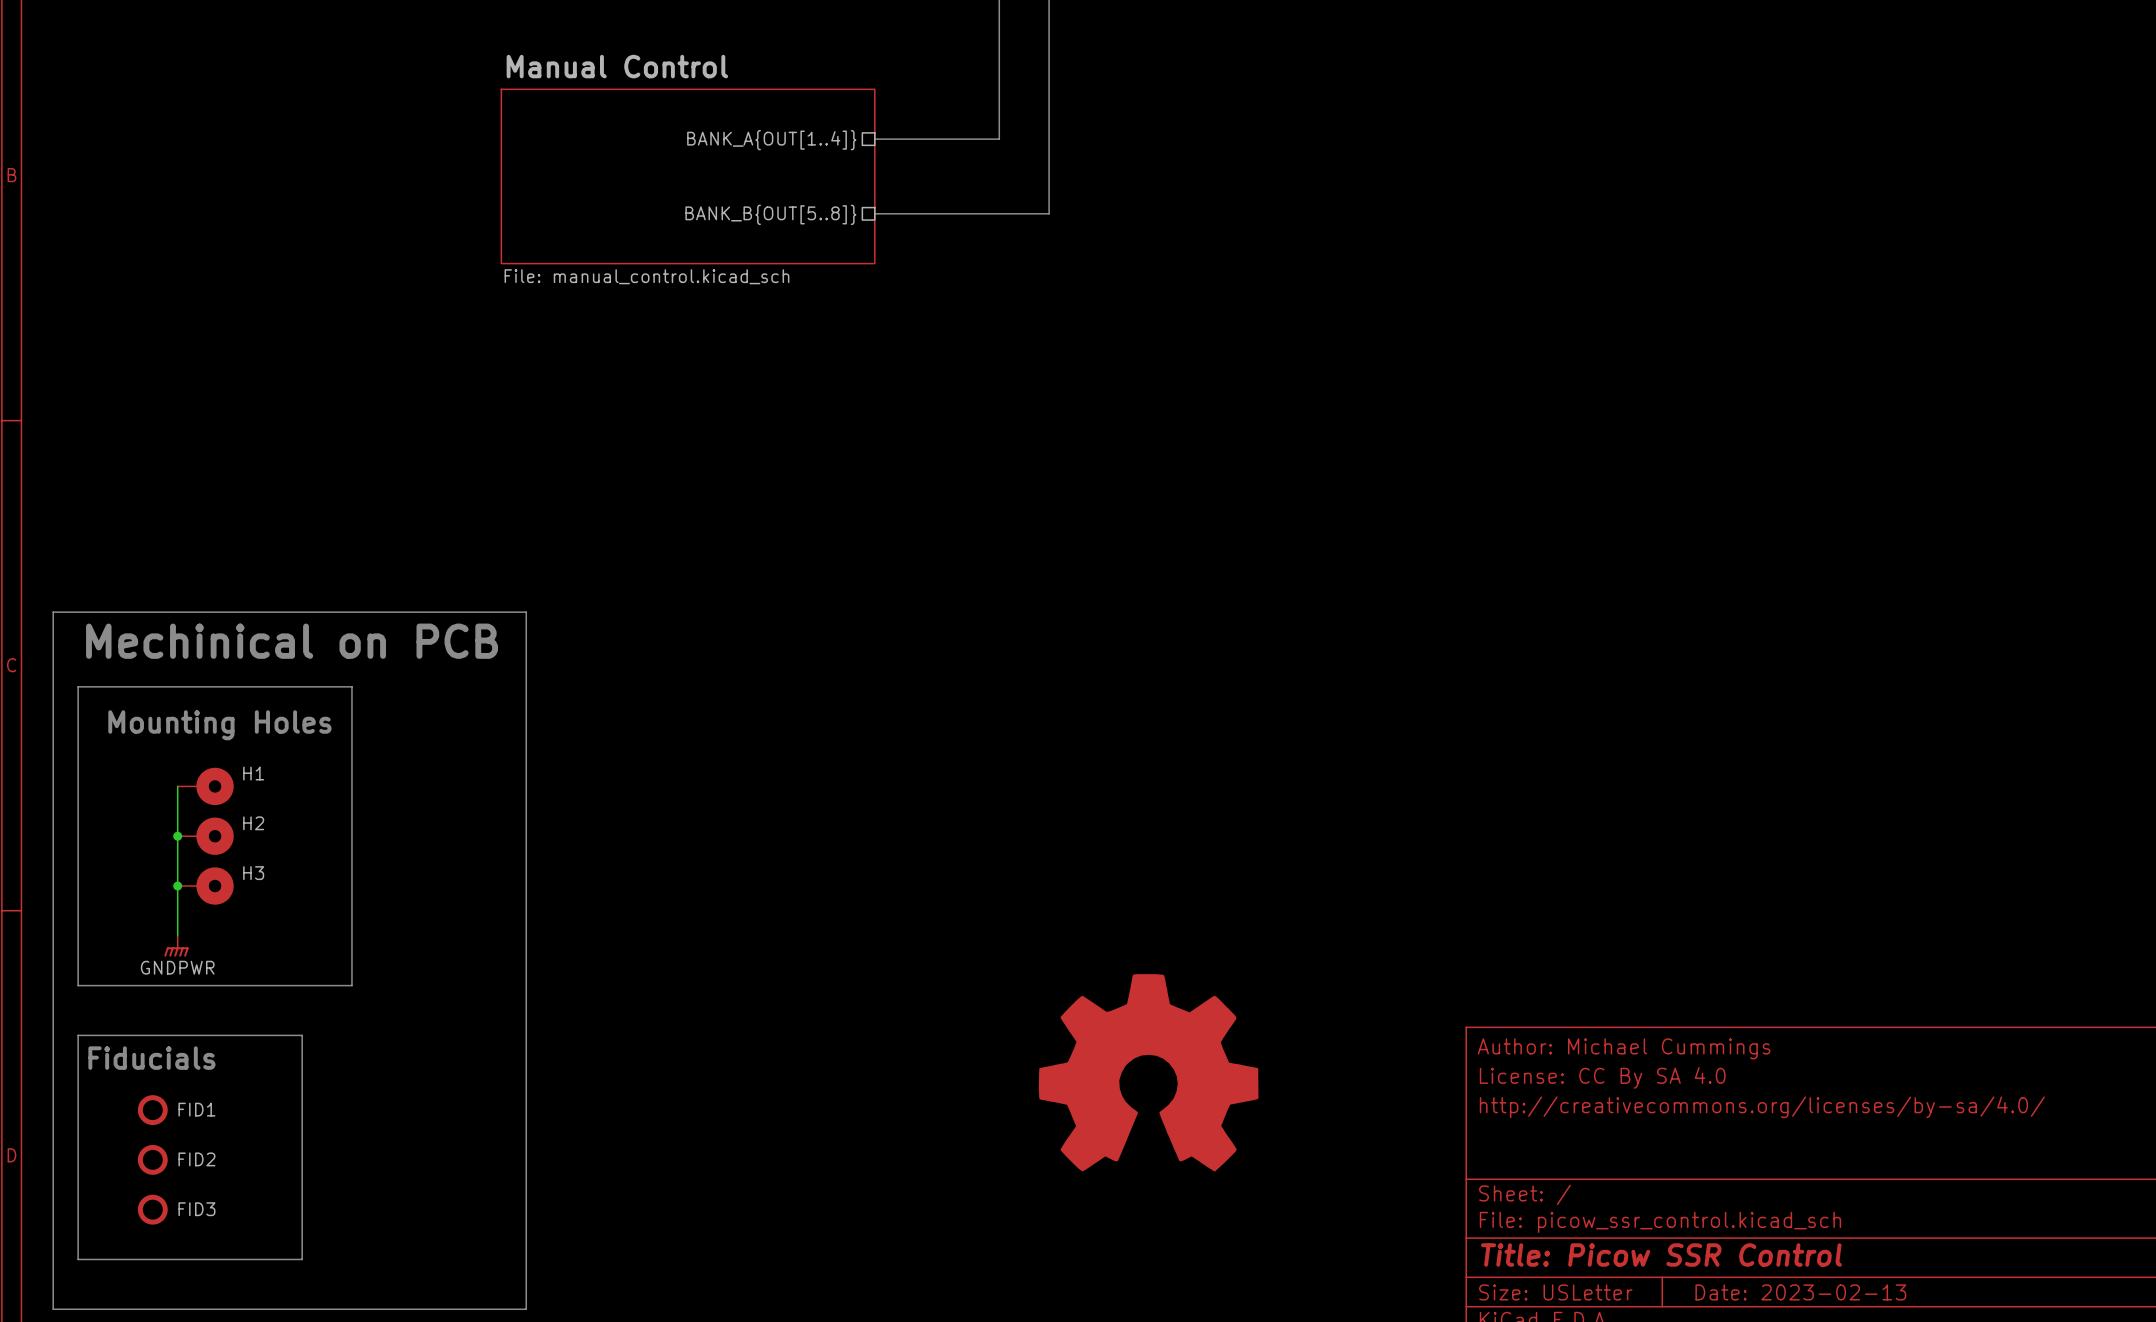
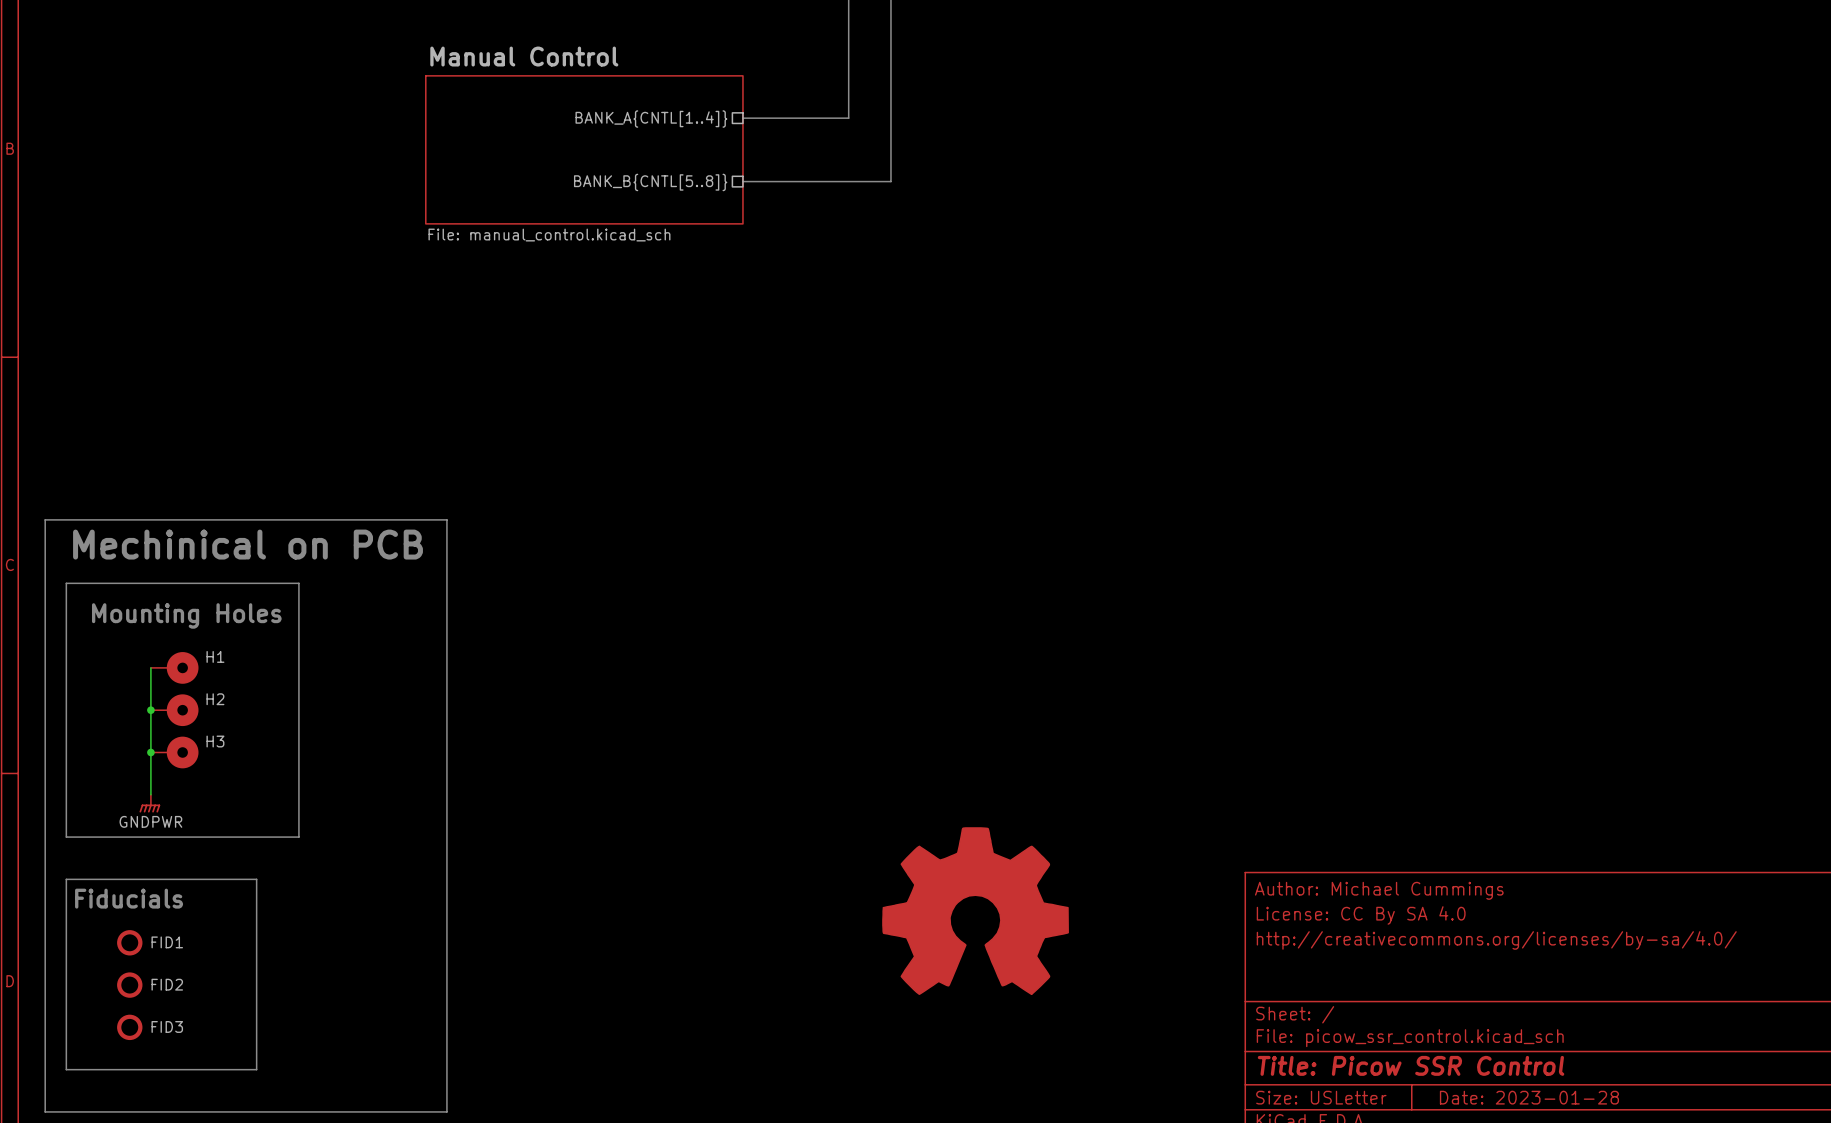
sheet pin: BANK_A{OUT[1..4]} (771, 140) -> BANK_A{CNTL[1..4]} (651, 119)
sheet pin: BANK_B{OUT[5..8]} (770, 214) -> BANK_B{CNTL[5..8]} (650, 182)
title block: Date: 2023-02-13 (1800, 1292) -> Date: 2023-01-28 (1529, 1097)

